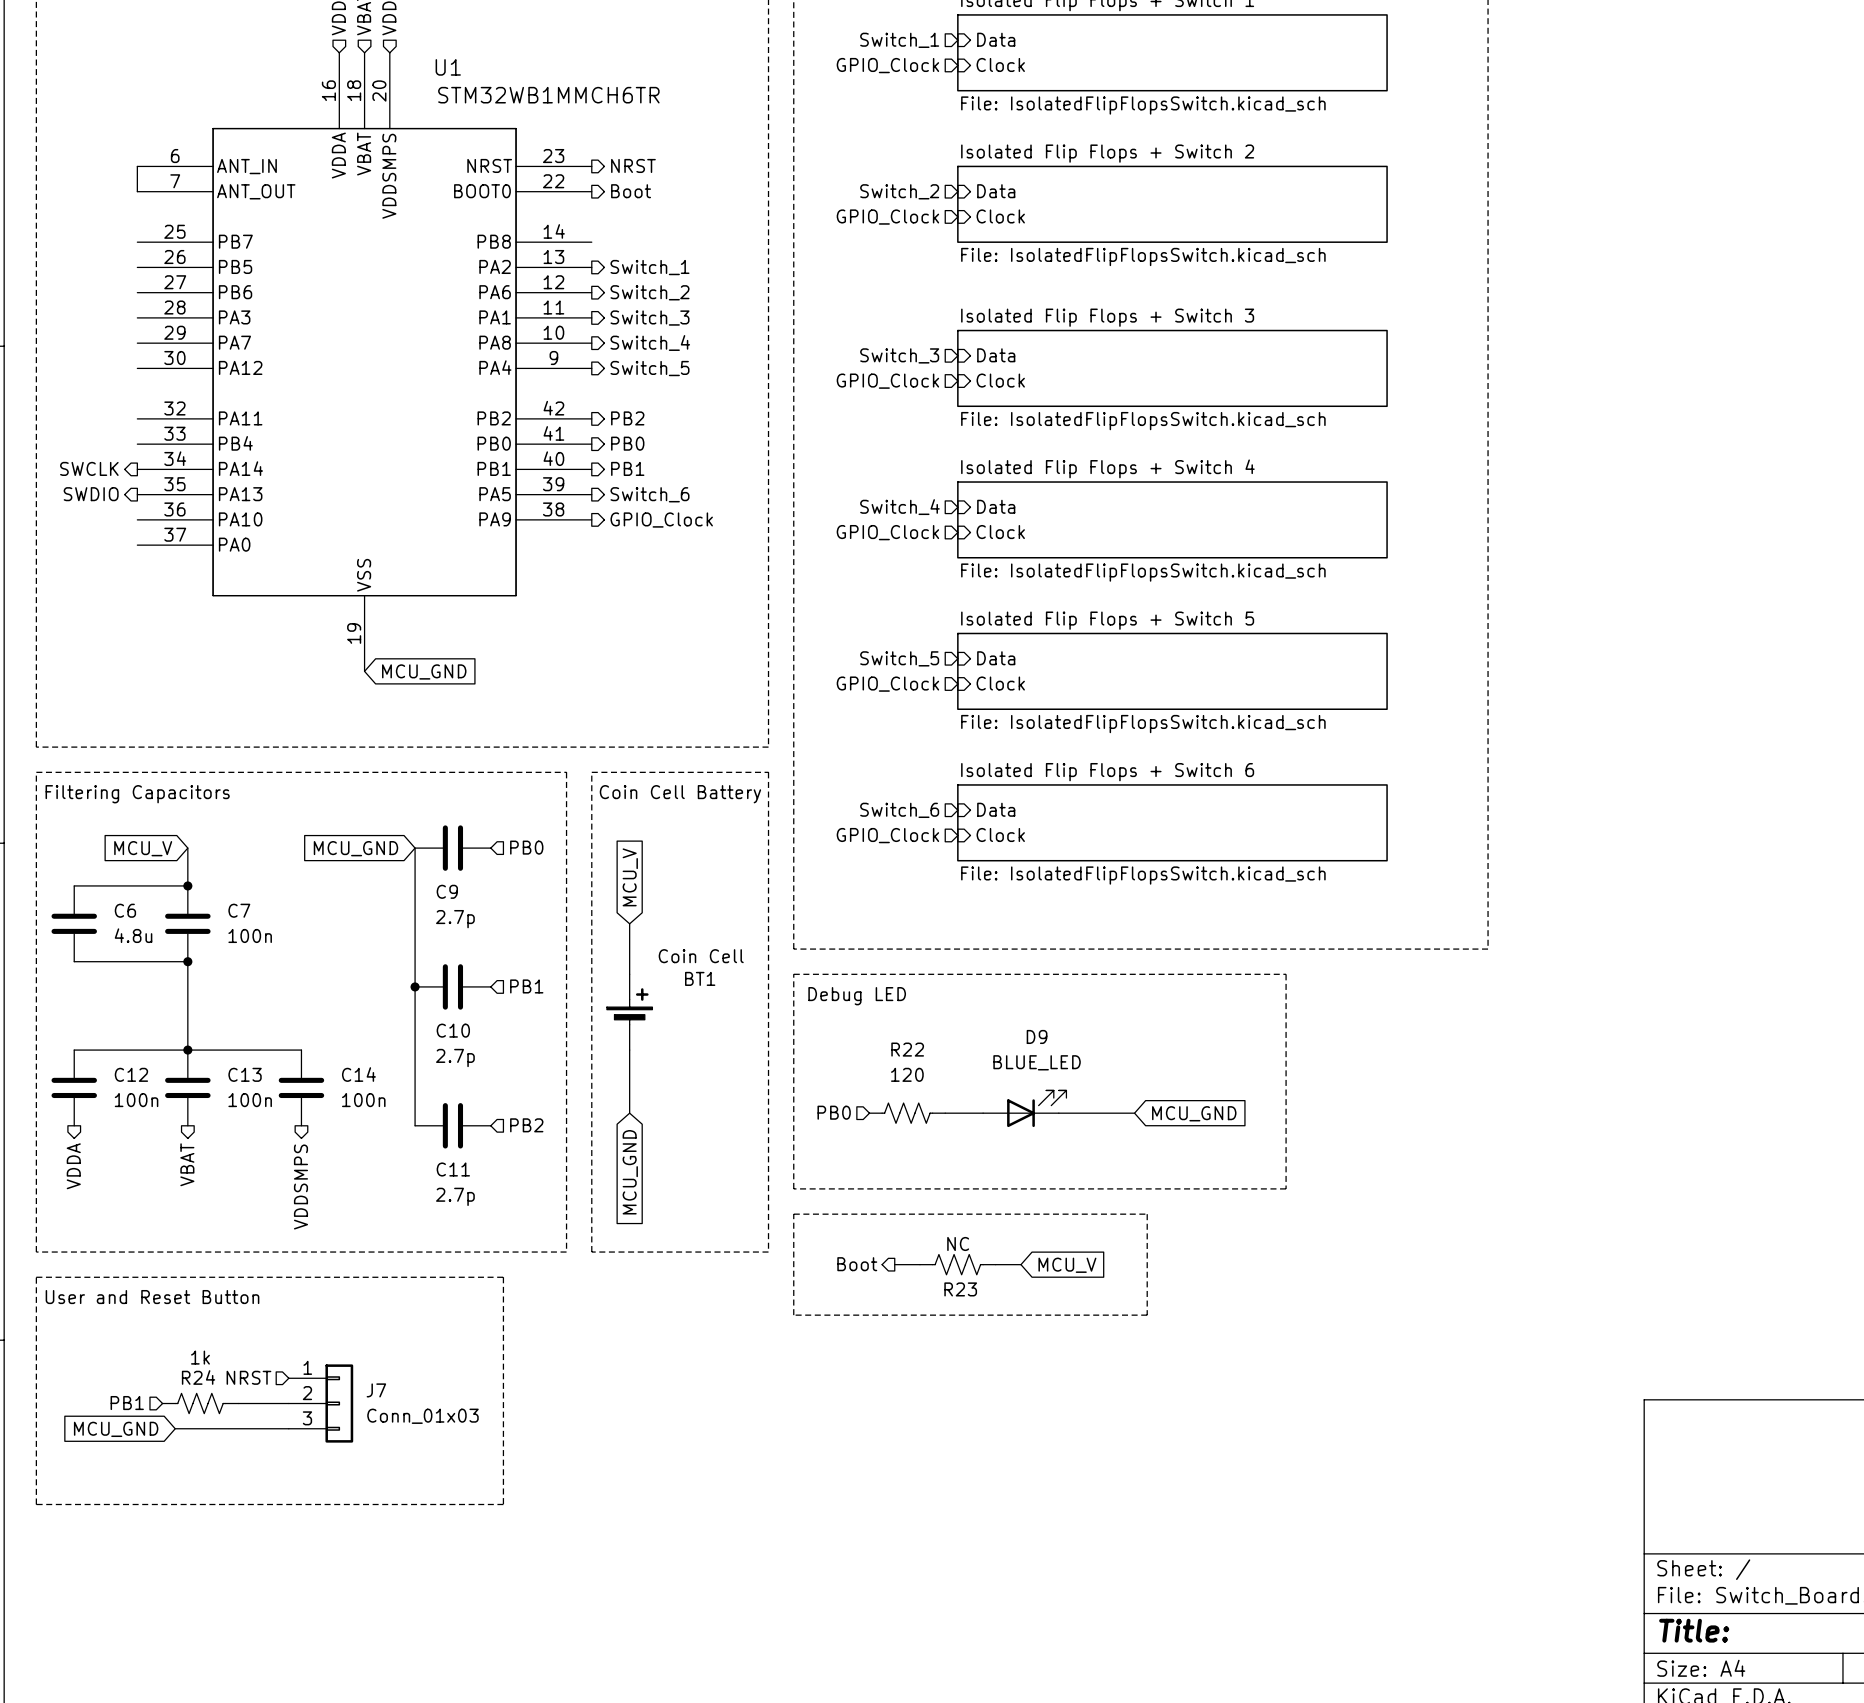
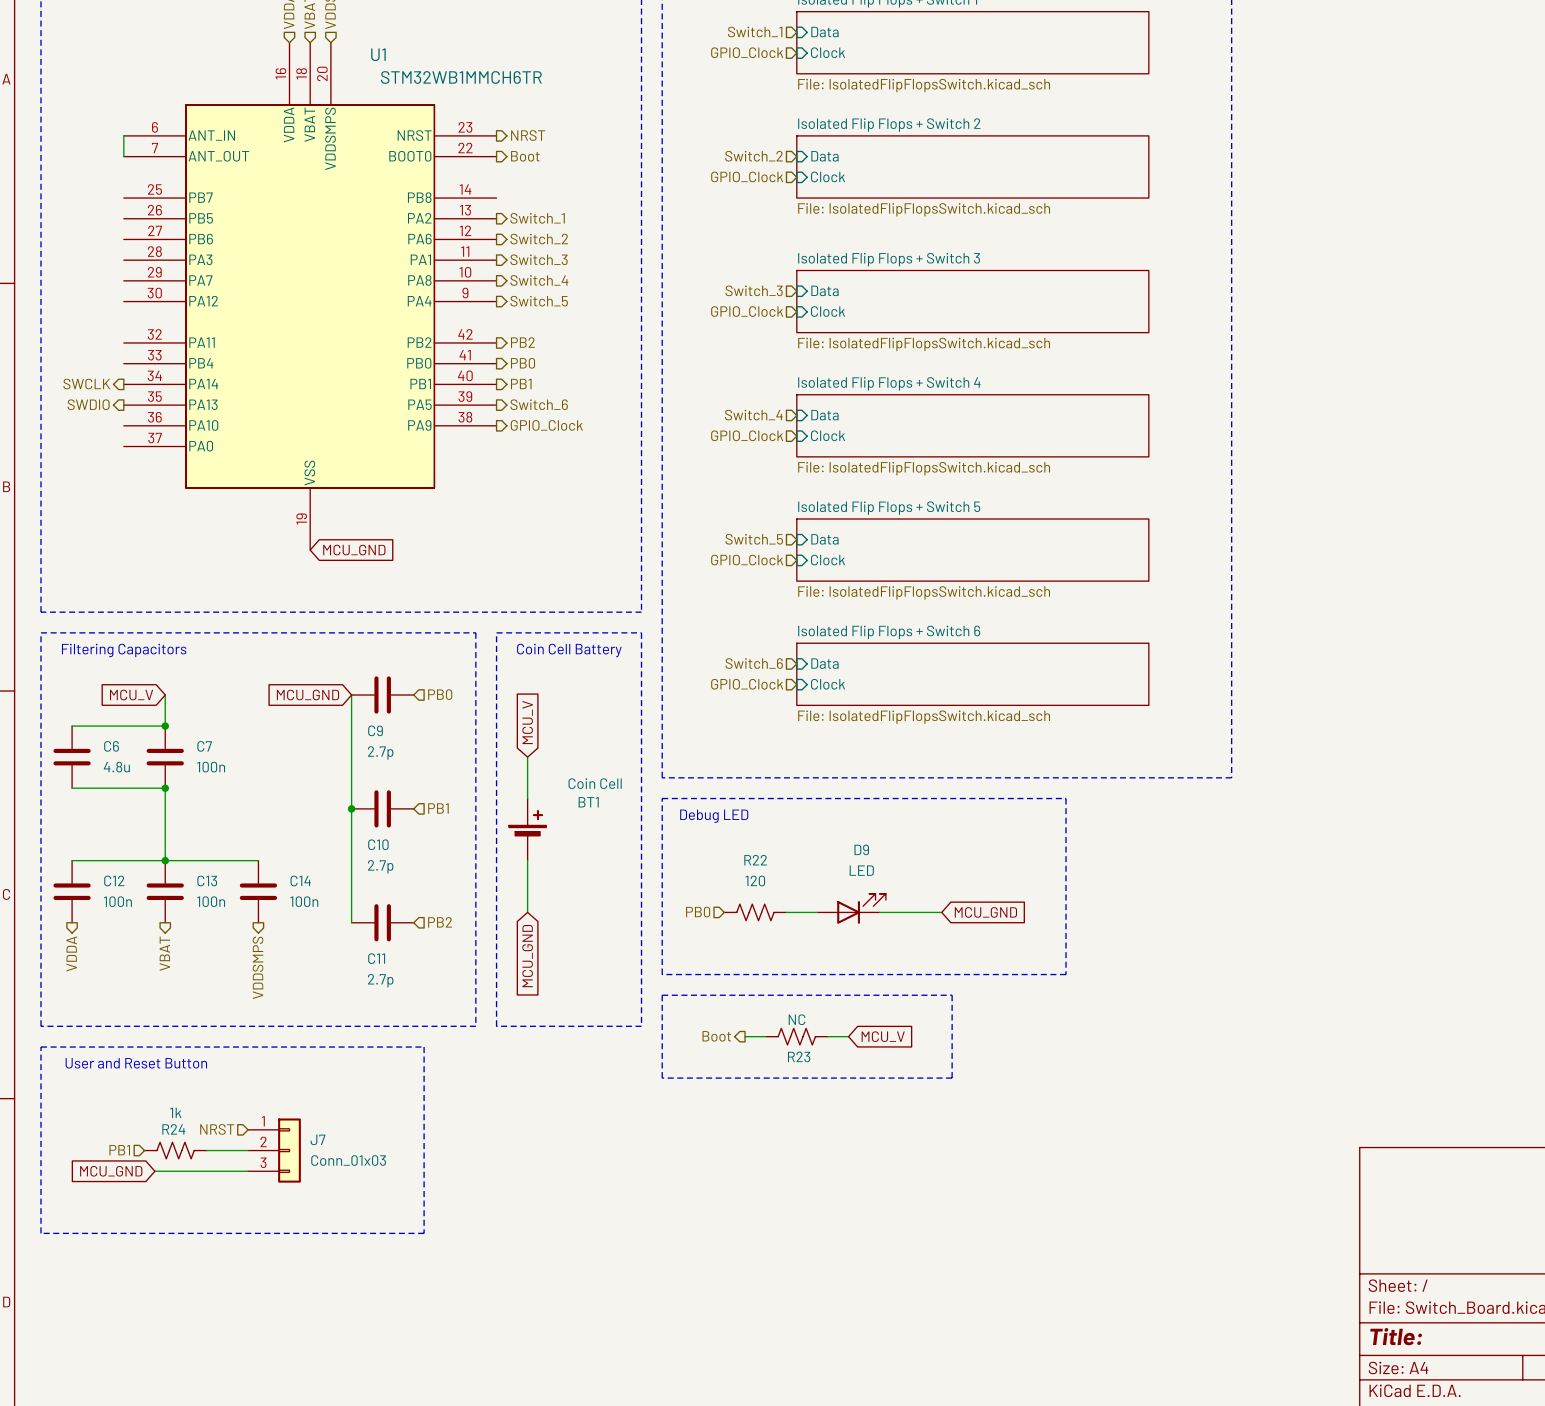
D9 value: BLUE_LED (1037, 1062) -> LED (861, 870)

